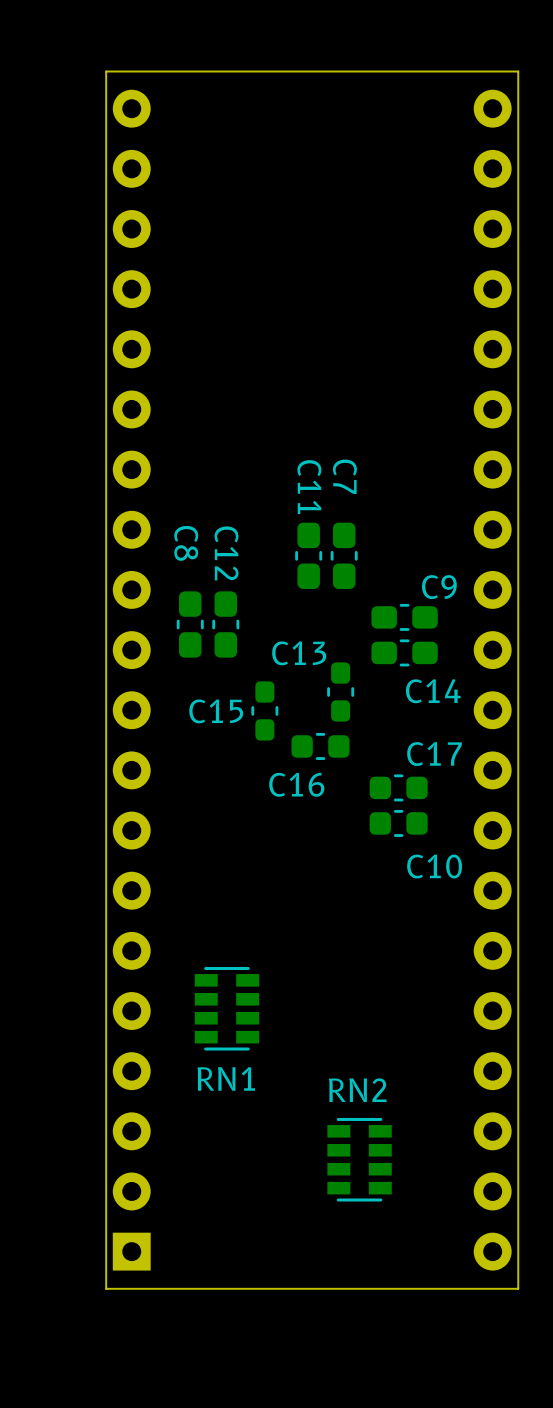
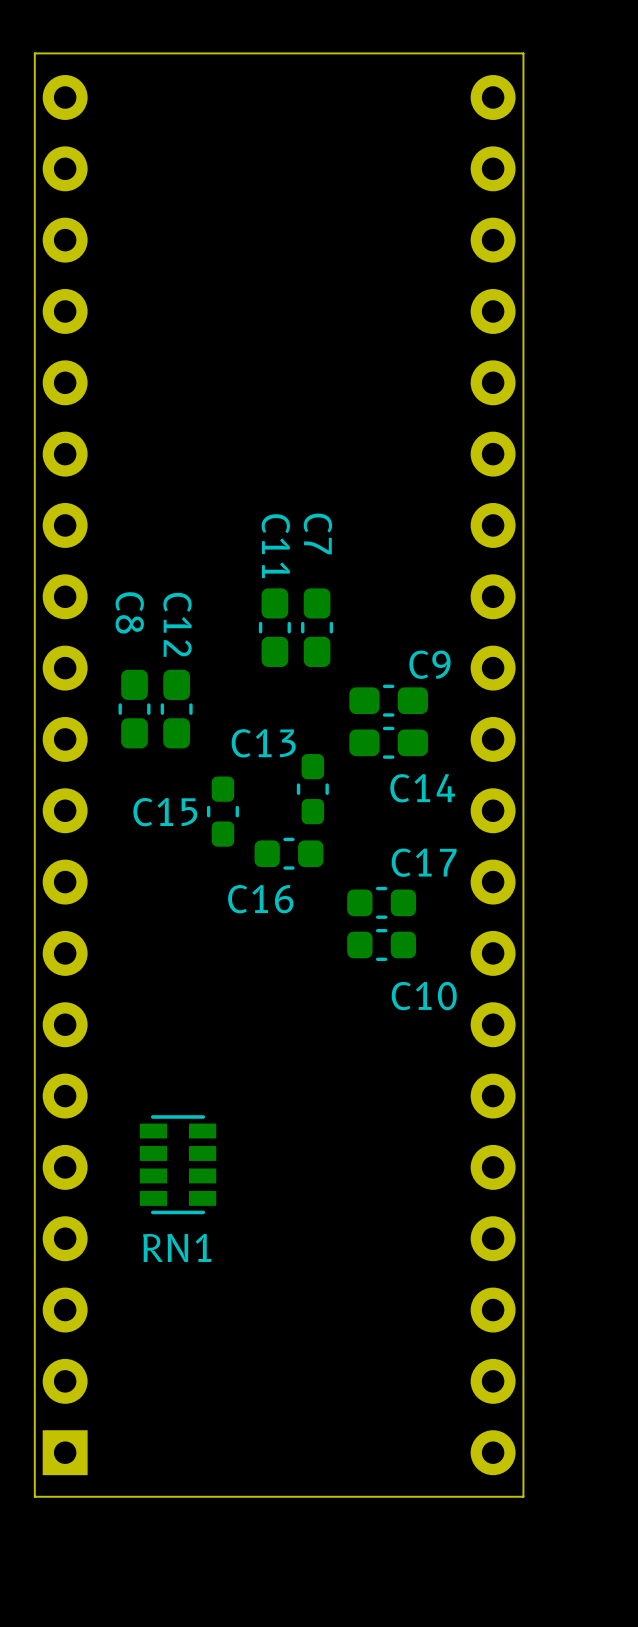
RN2: (359, 1159) -> none

